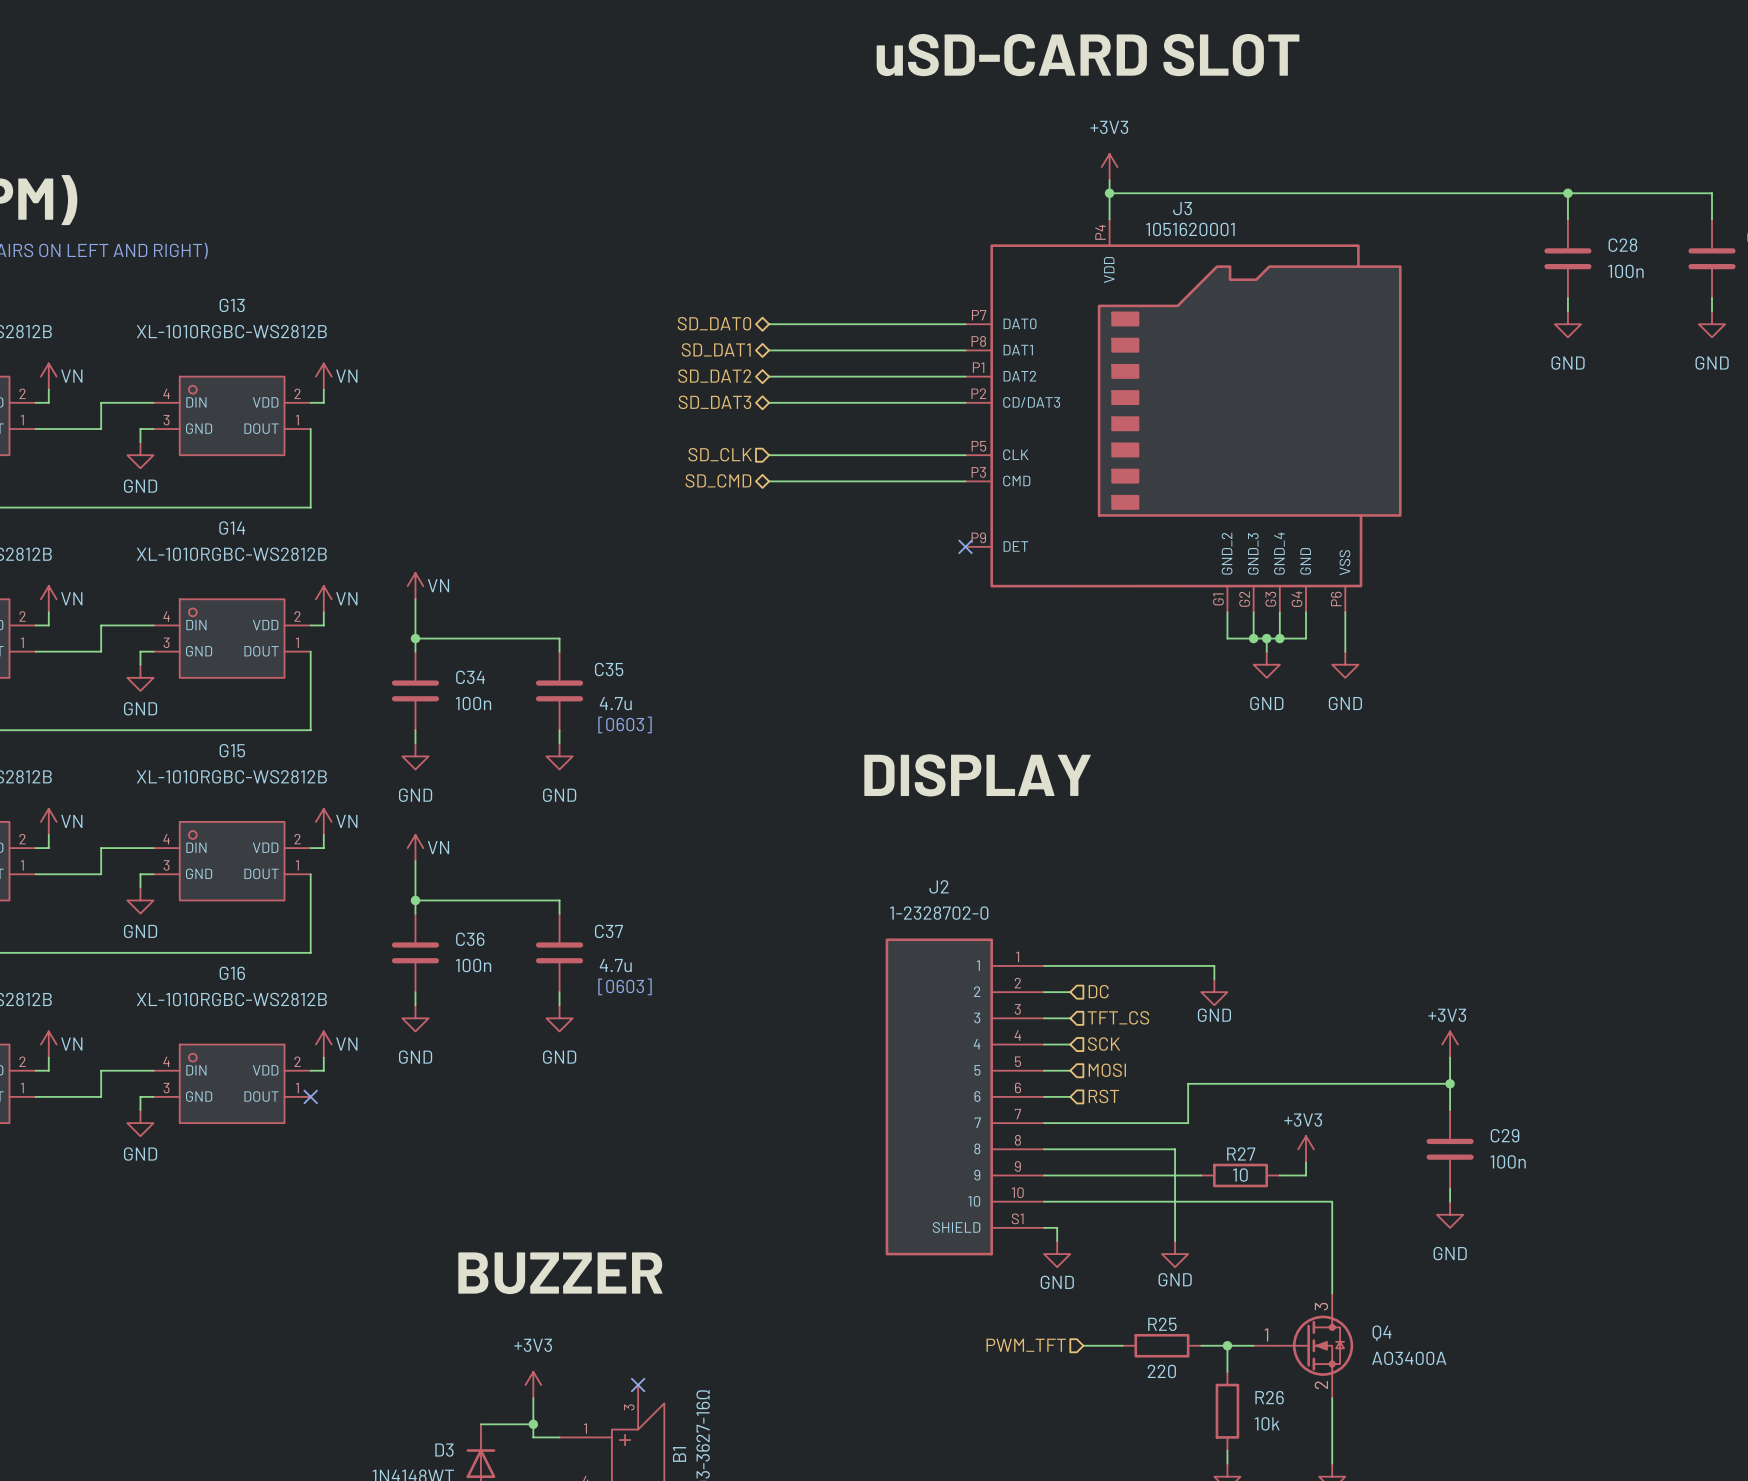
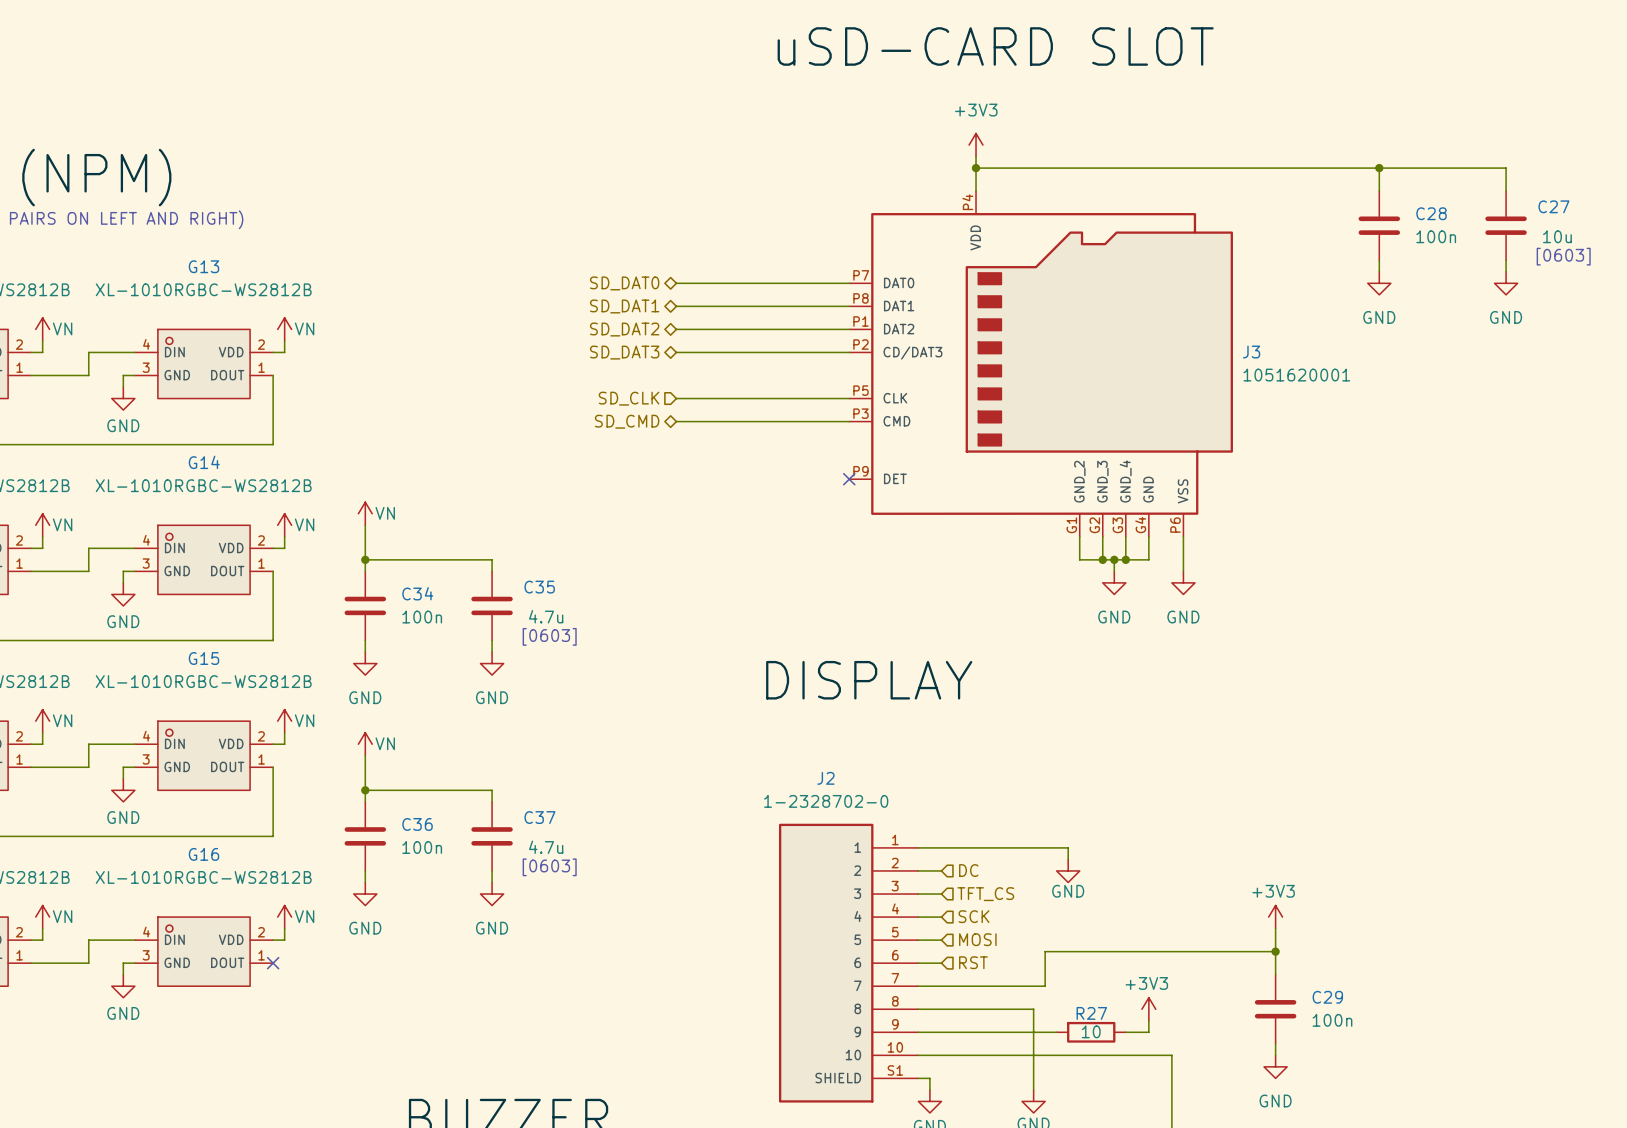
J3 name position: J3 (1182, 208) -> J3 (1251, 352)
J3 value position: 1051620001 (1190, 229) -> 1051620001 (1296, 375)

